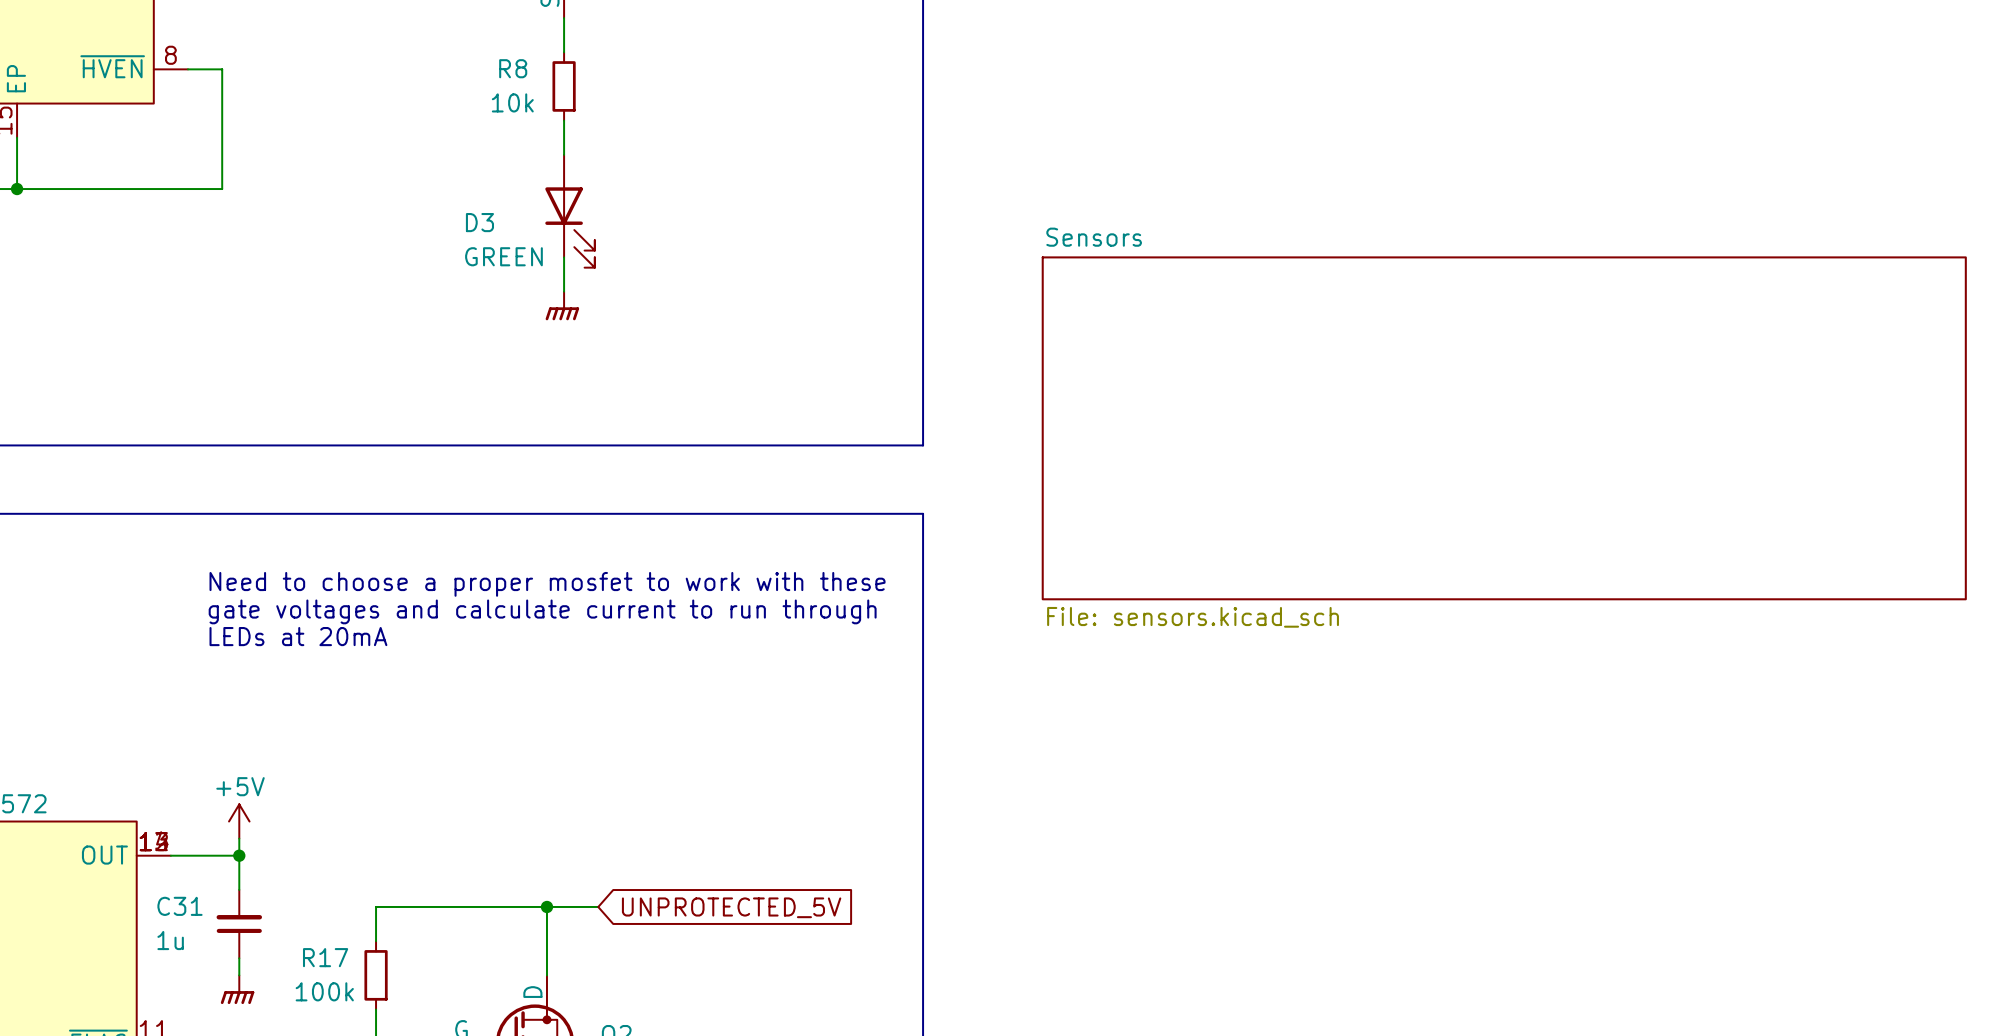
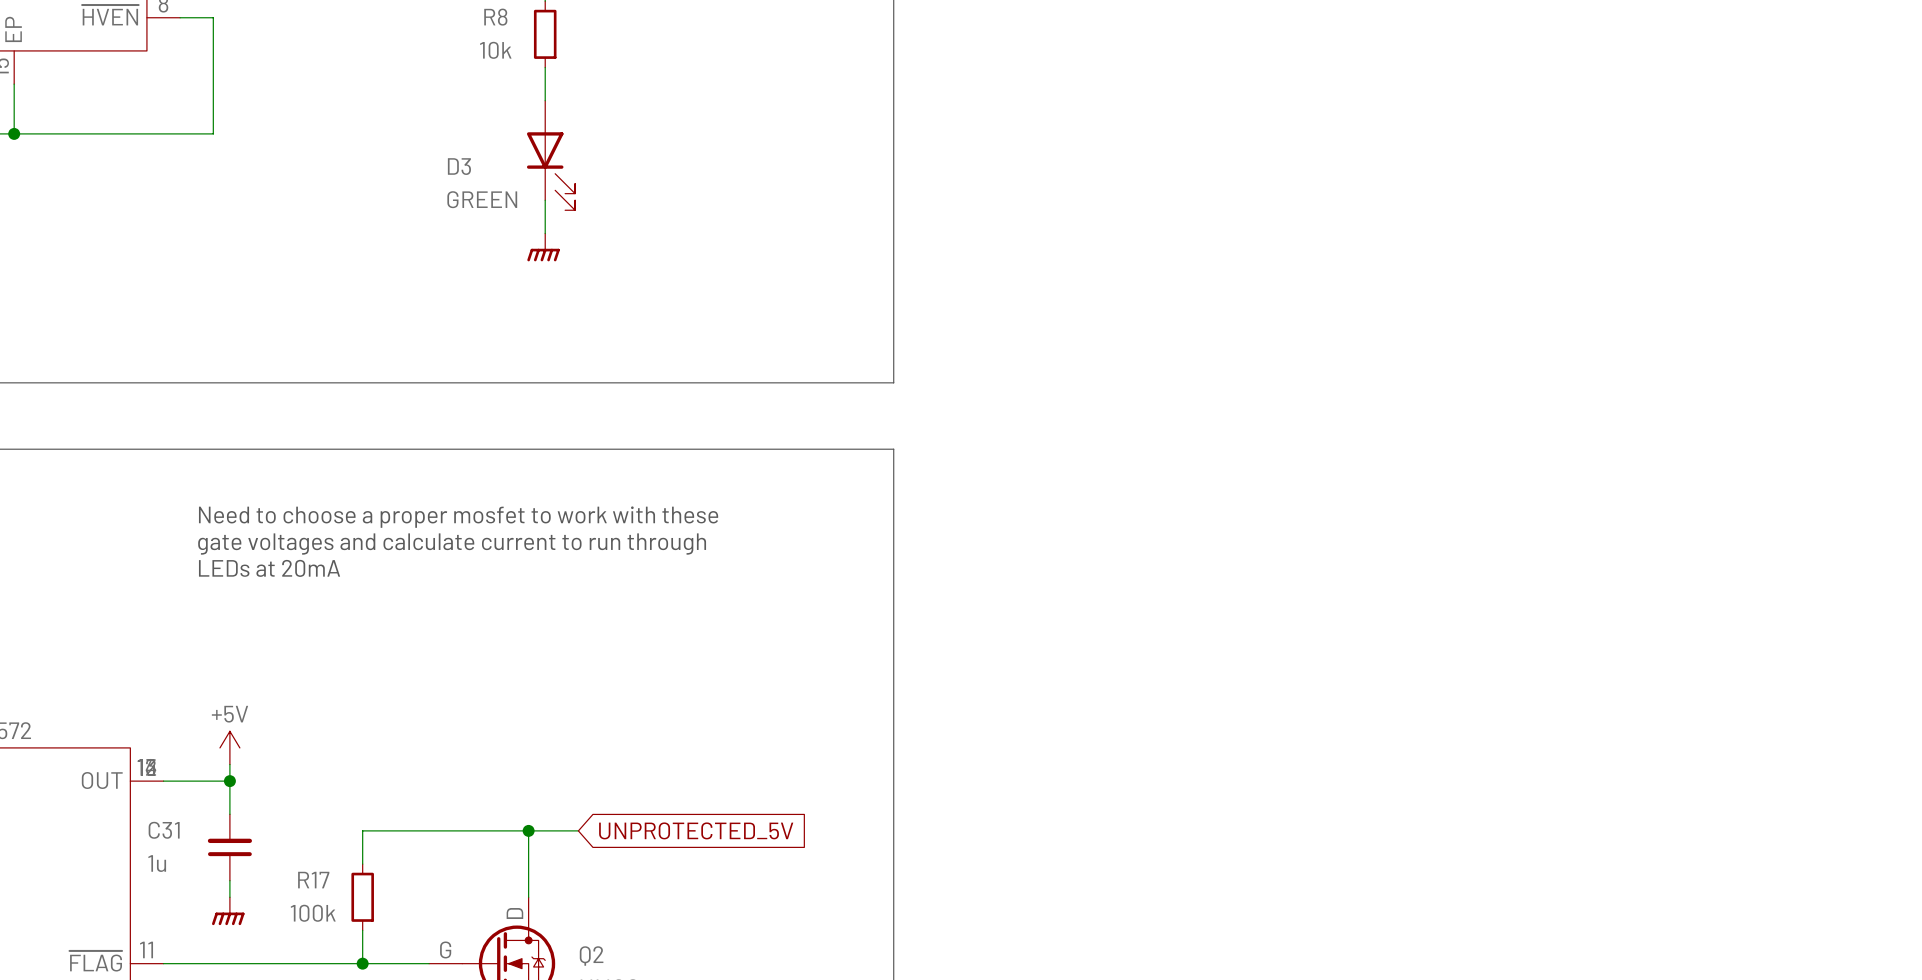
sheet Sensors: File: sensors.kicad_sch (1504, 428) -> none

